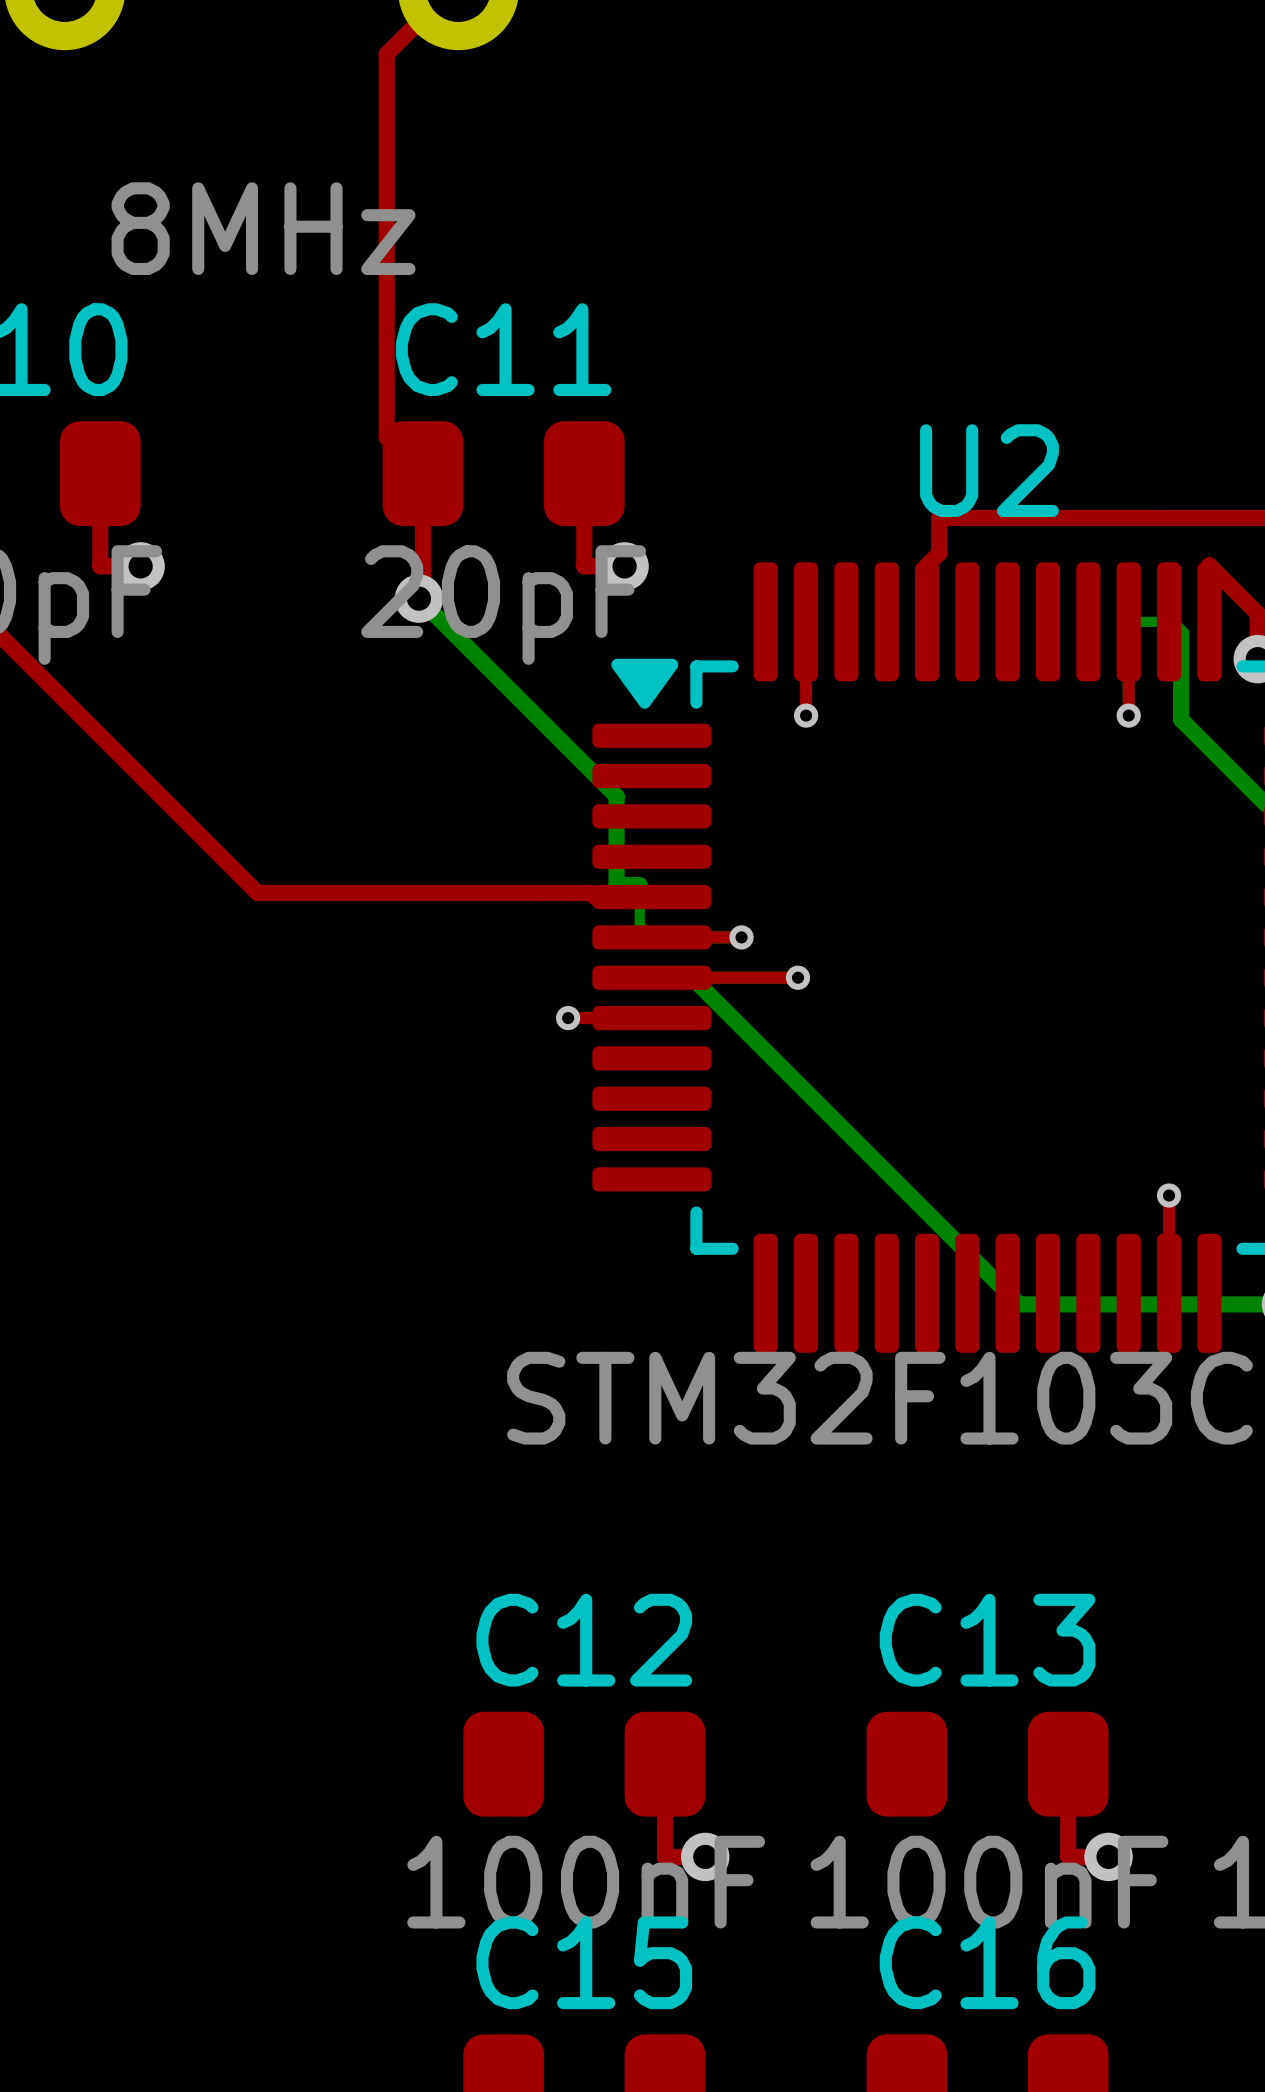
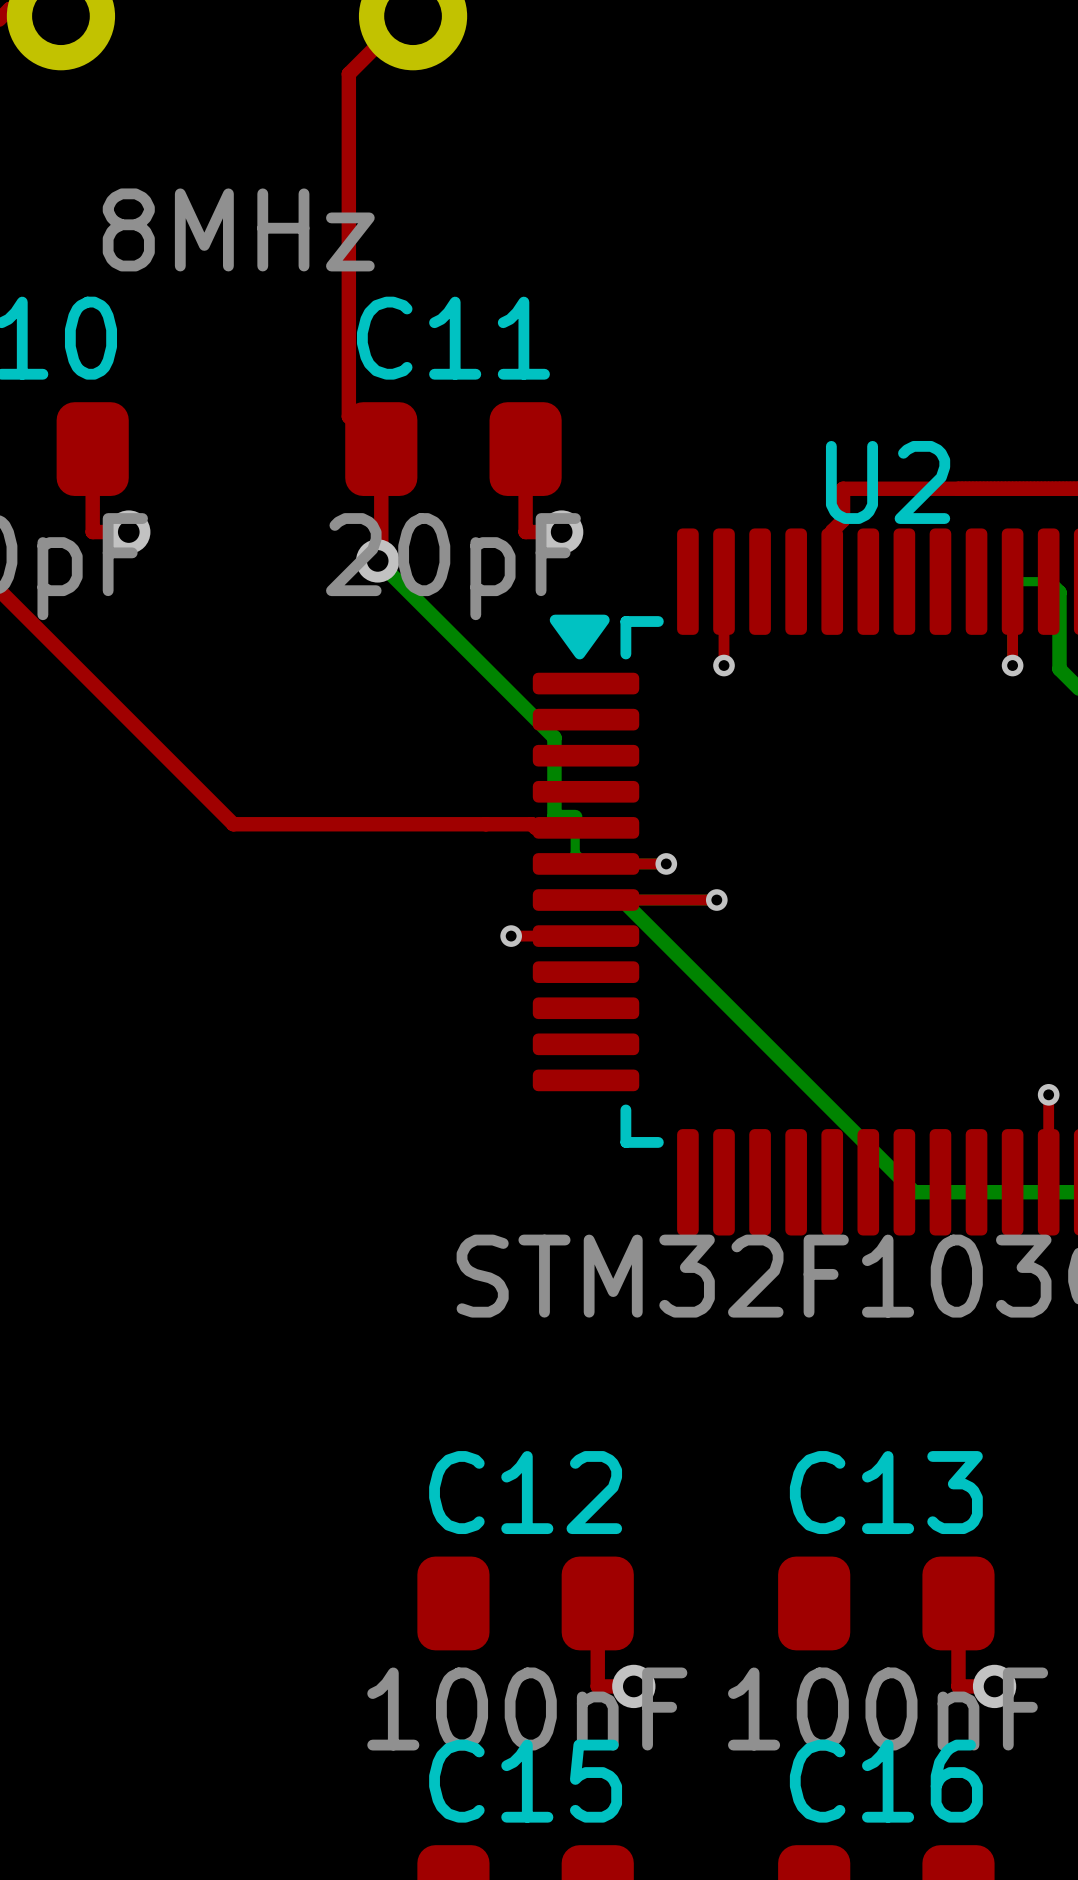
U2 name position: U2 (989, 470) -> U2 (888, 482)

